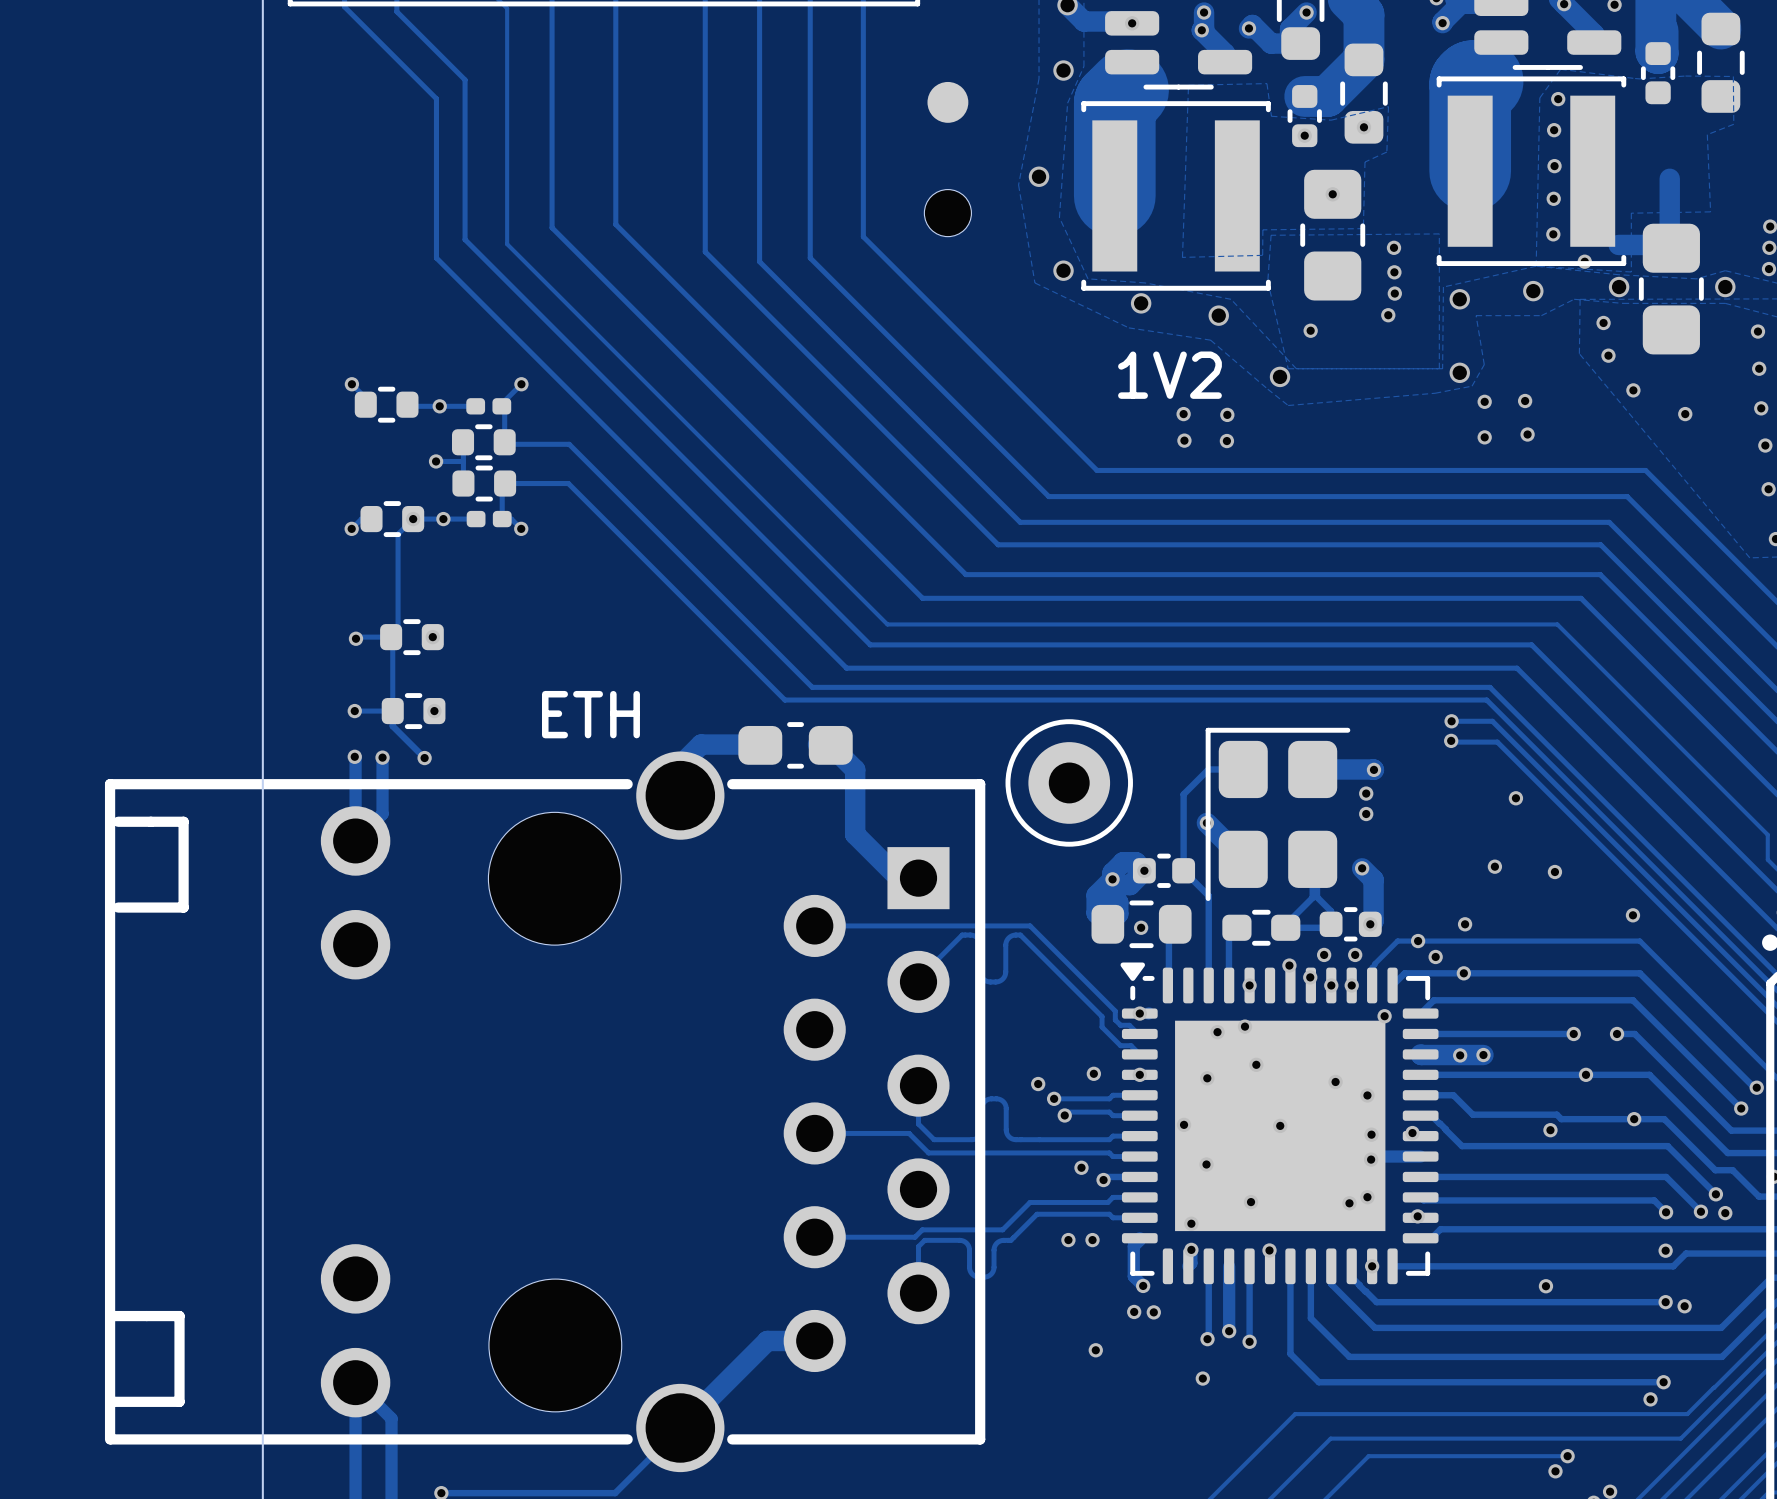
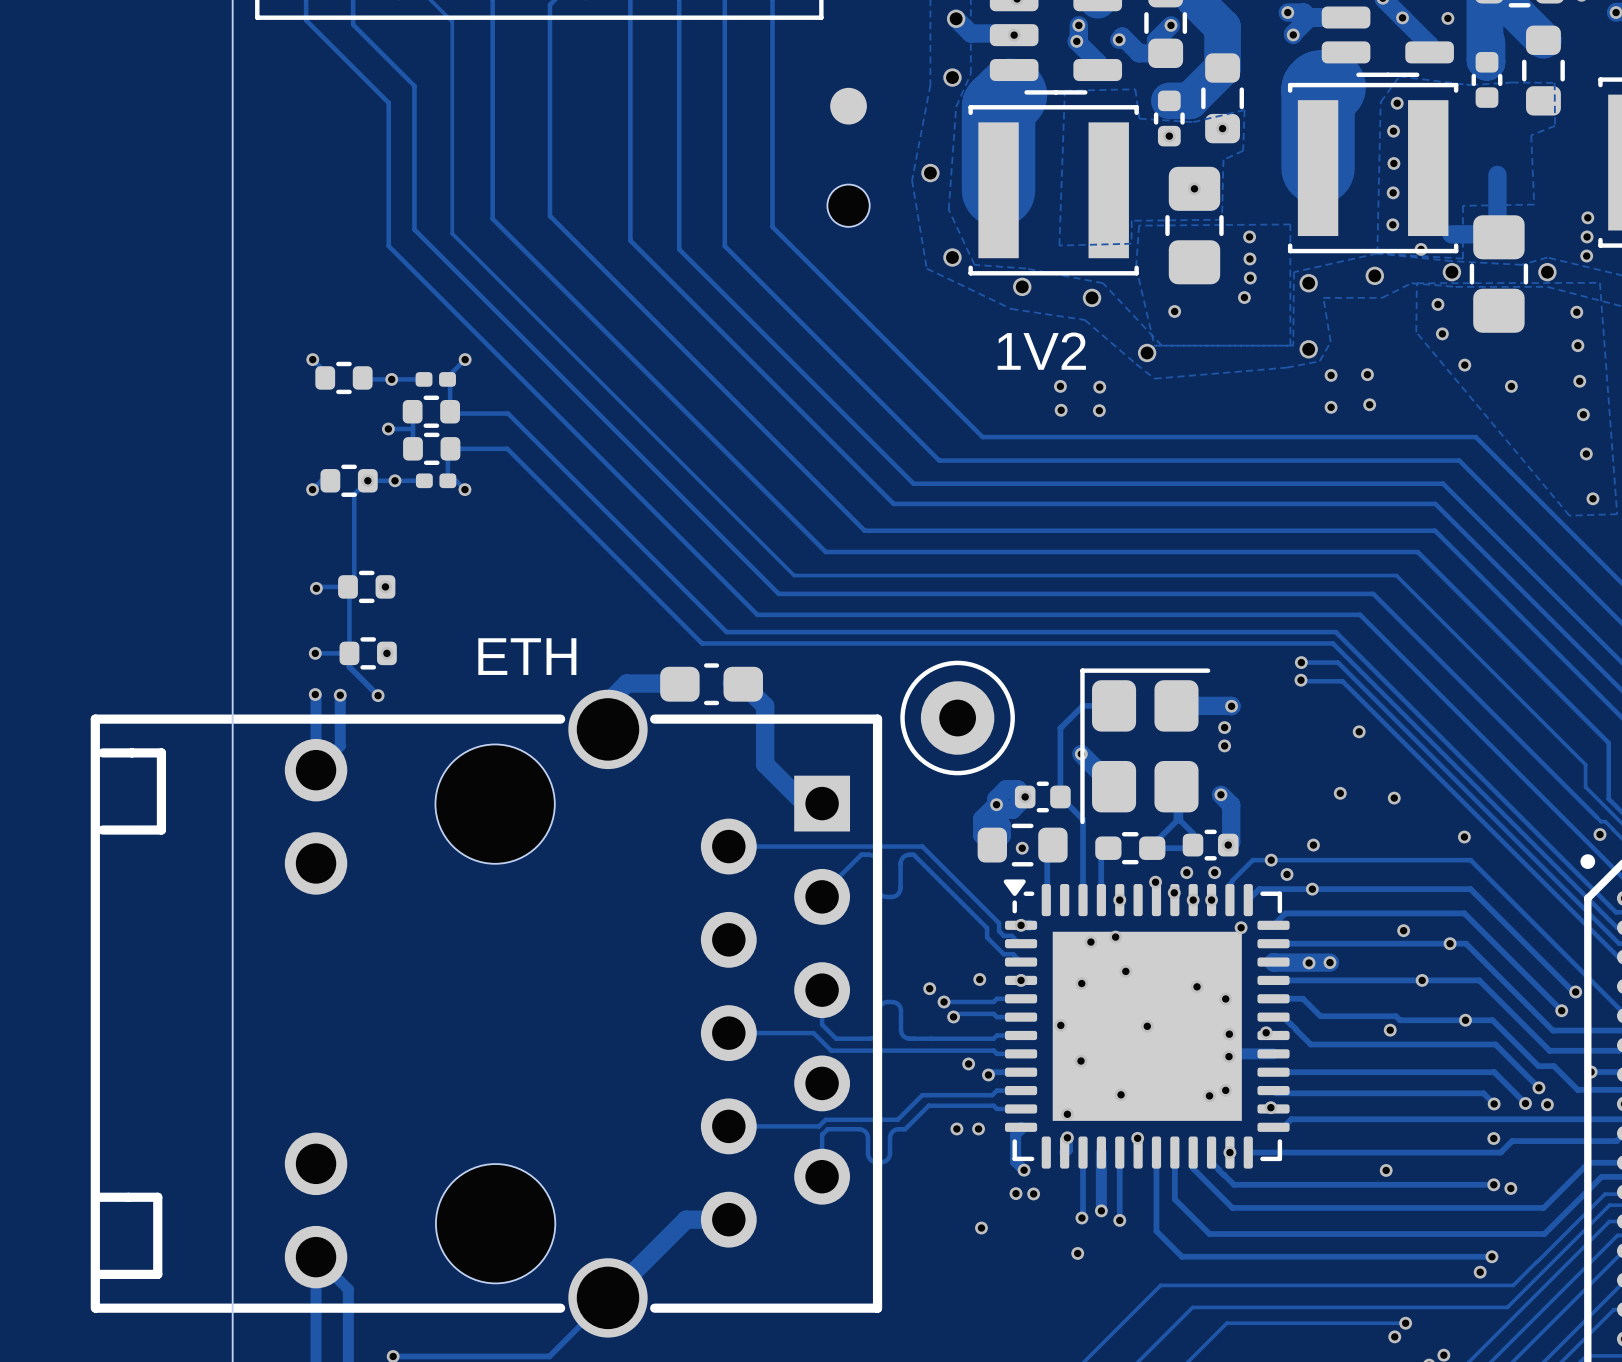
track: none -> (1411, 943) (1450, 943)
via position: (1573, 1033) -> (1403, 930)

